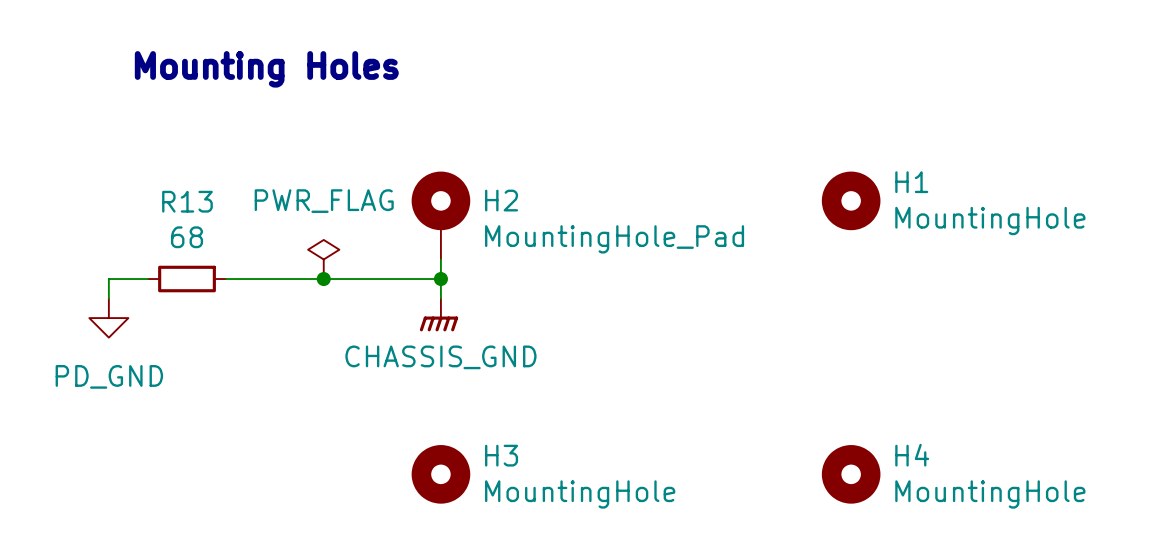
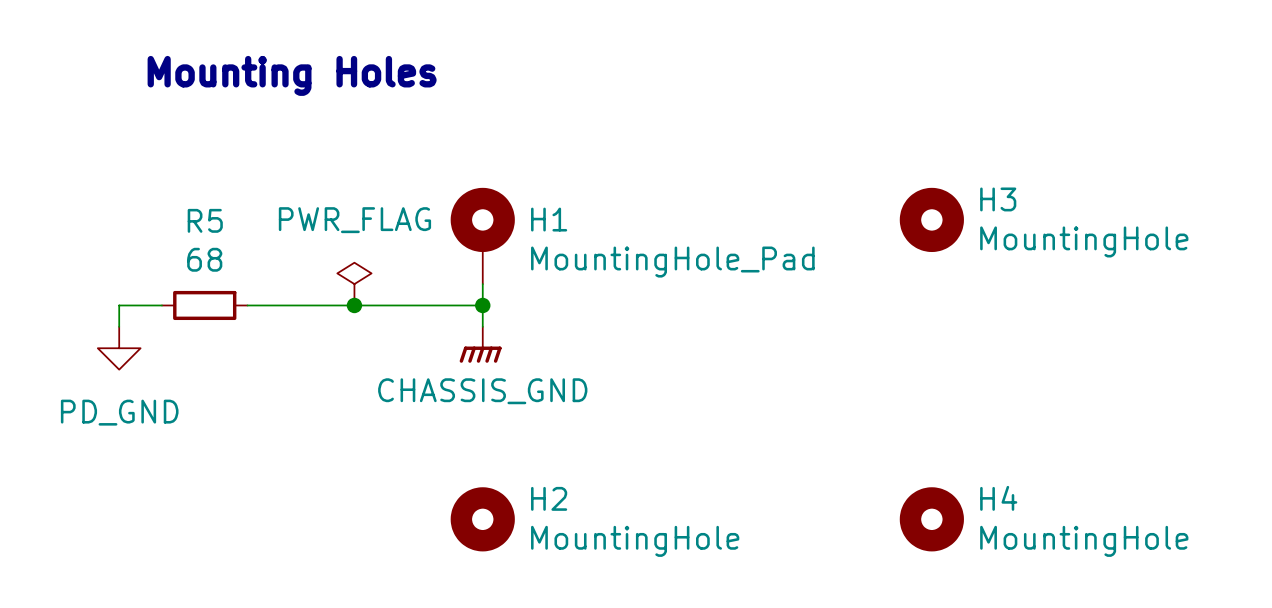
H1 name: H1 (911, 182) -> H3 (998, 199)
H2 name: H2 (501, 200) -> H1 (549, 219)
R13 name: R13 (187, 201) -> R5 (205, 220)
H3 name: H3 (501, 455) -> H2 (549, 498)

